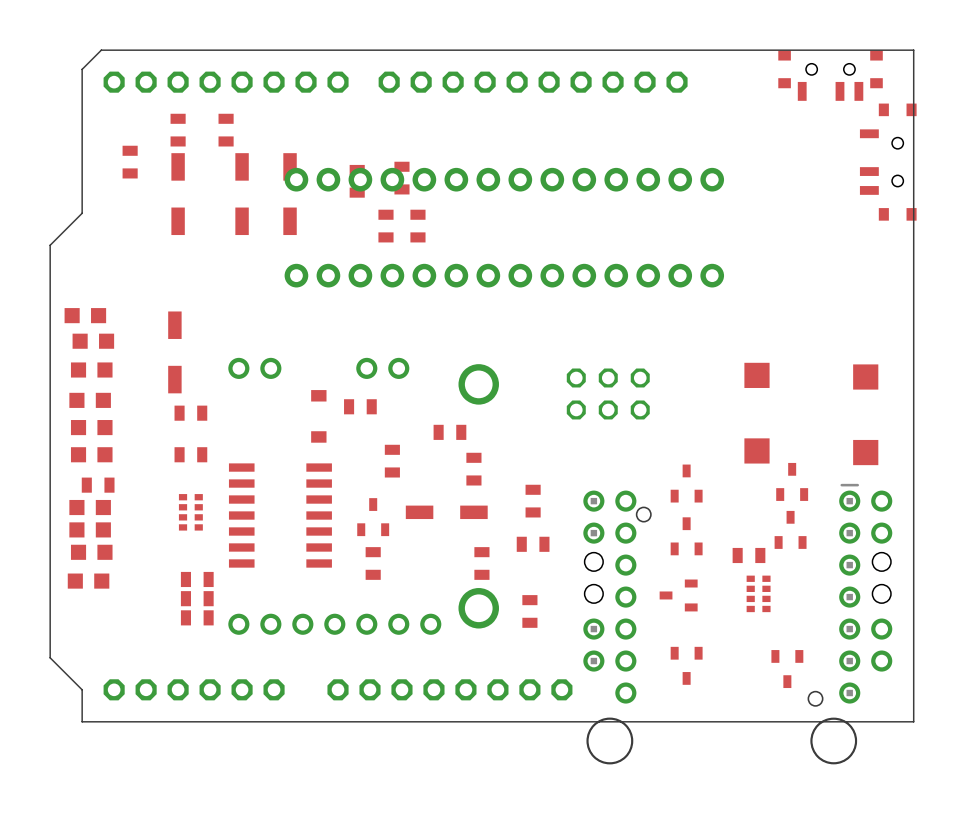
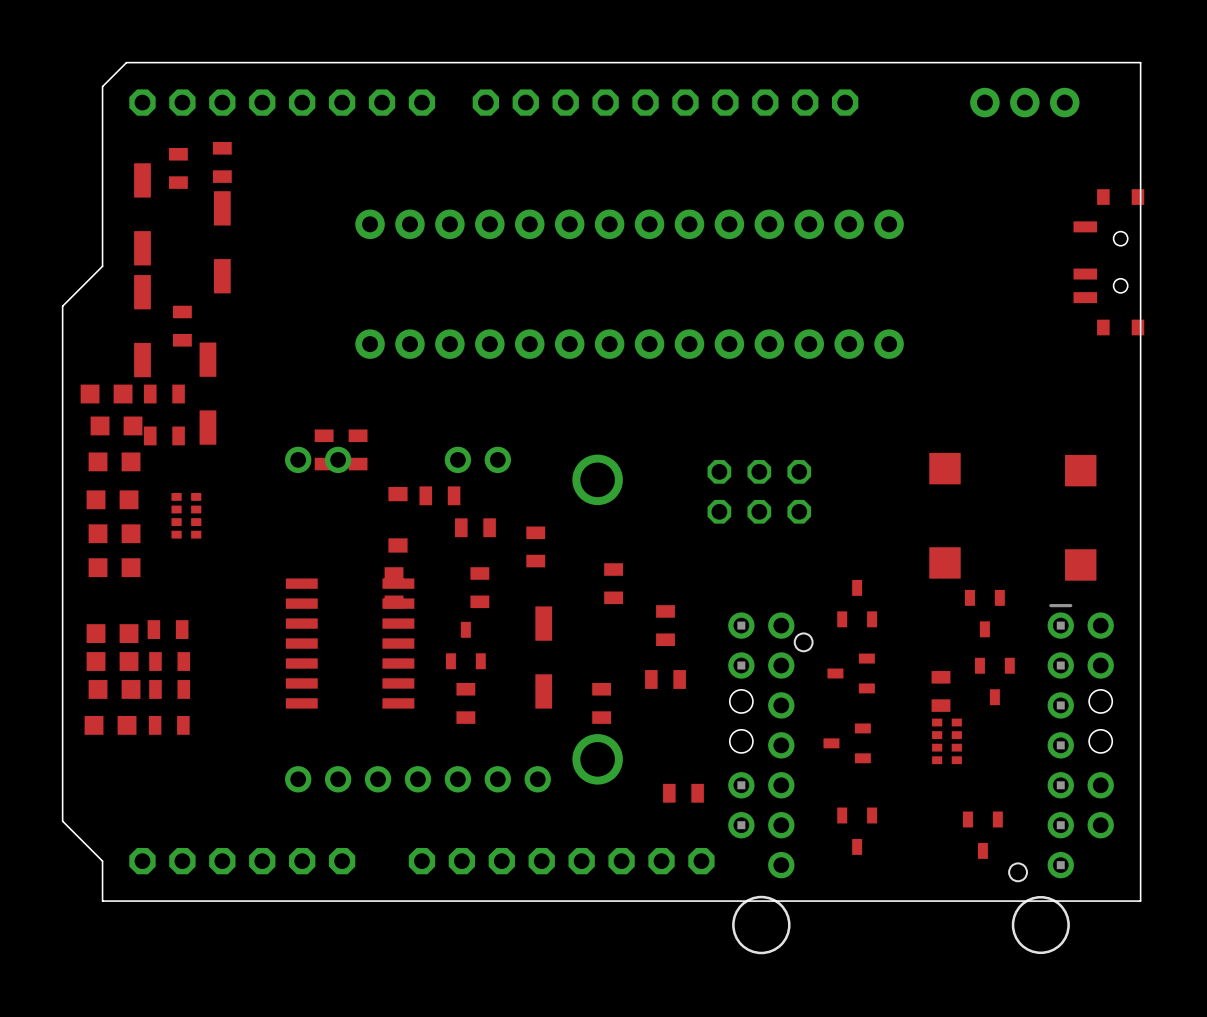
part footprint: [50, 50, 914, 722] -> [62, 62, 1141, 902]
part footprint: [778, 50, 883, 101] -> [970, 87, 1080, 118]
part: (226, 130) -> none
part position: (130, 162) -> (178, 168)
part position: (888, 162) -> (1108, 262)
part: none -> (142, 214)
part: (401, 178) -> none
part: (357, 181) -> none
part: (242, 194) -> none
part: (290, 194) -> none
part: (385, 226) -> none
part: (417, 226) -> none
part: none -> (142, 326)
part: none -> (182, 326)
part: none -> (164, 394)
part: none -> (164, 435)
part position: (174, 352) -> (207, 393)
part: none -> (324, 449)
part: none -> (358, 449)
part position: (360, 406) -> (439, 495)
part: (190, 413) -> none
part: none -> (475, 527)
part rotation: 0° (449, 432) -> 90° clockwise (535, 546)
part position: (449, 432) -> (535, 546)
part: (190, 454) -> none
part position: (392, 461) -> (479, 587)
part position: (473, 469) -> (613, 583)
part: none -> (394, 587)
part rotation: 0° (792, 481) -> 180° (984, 613)
part: (98, 485) -> none
part: none -> (168, 629)
part position: (190, 512) -> (186, 515)
part rotation: 0° (446, 512) -> 90° clockwise (543, 657)
part: none -> (169, 661)
part rotation: 0° (790, 529) -> 180° (994, 681)
part rotation: 0° (686, 536) -> 90° counterclockwise (851, 673)
part: none -> (169, 689)
part rotation: 0° (748, 555) -> 90° clockwise (940, 691)
part: (197, 579) -> none
part: none -> (169, 725)
part: (197, 598) -> none
part rotation: 0° (529, 611) -> 90° clockwise (683, 793)
part position: (529, 611) -> (683, 793)
part: (197, 617) -> none

